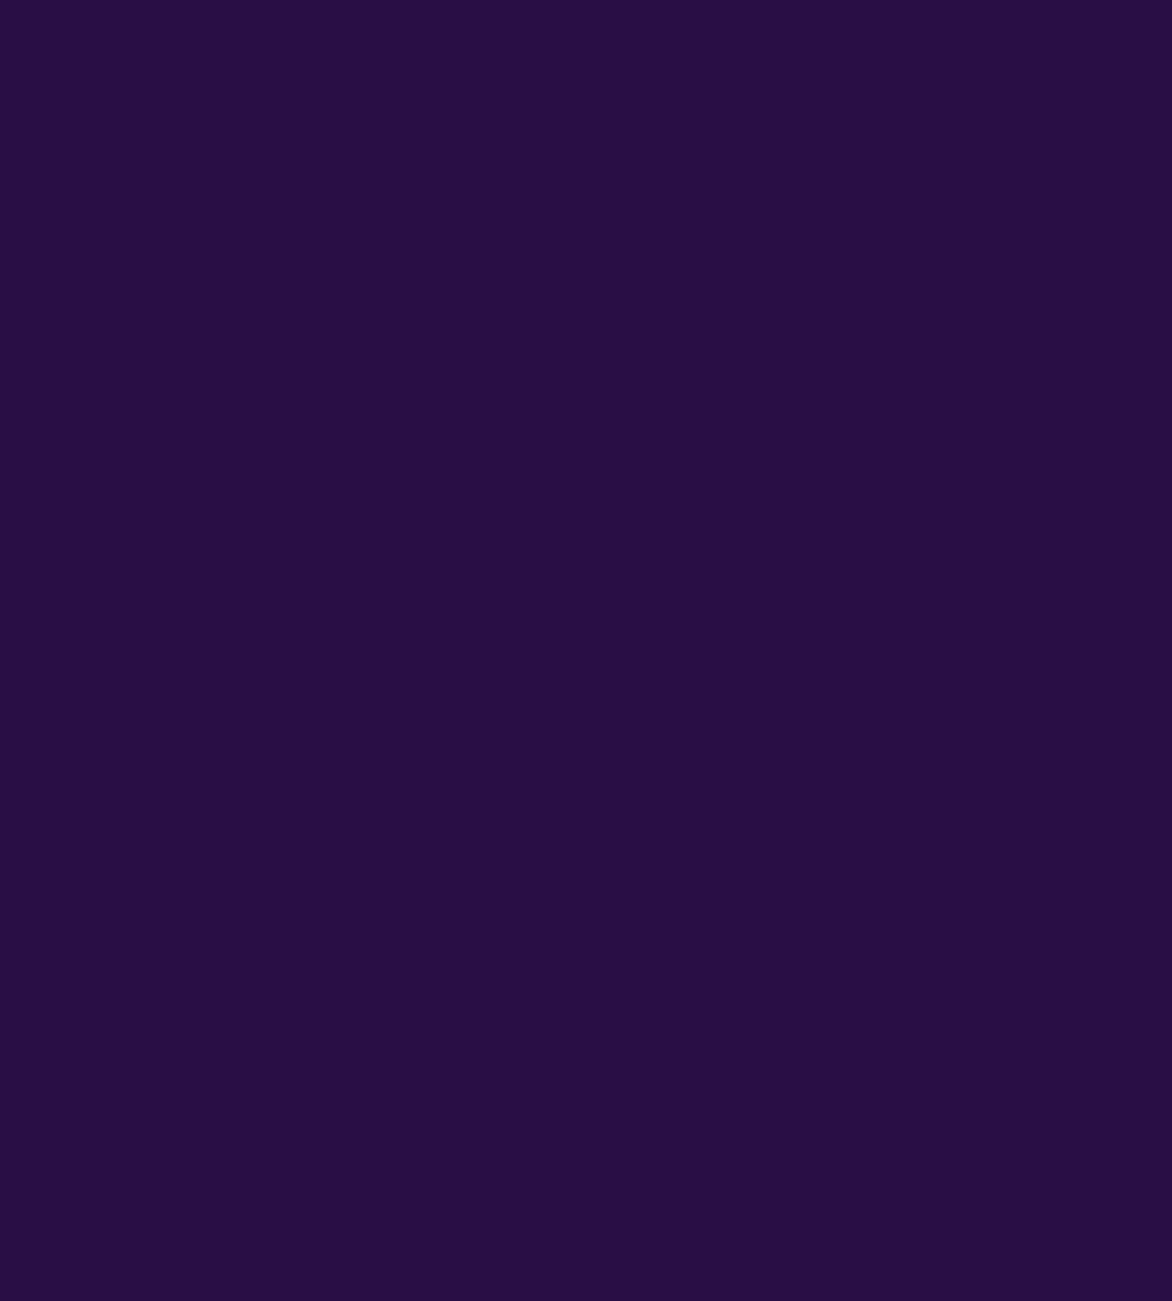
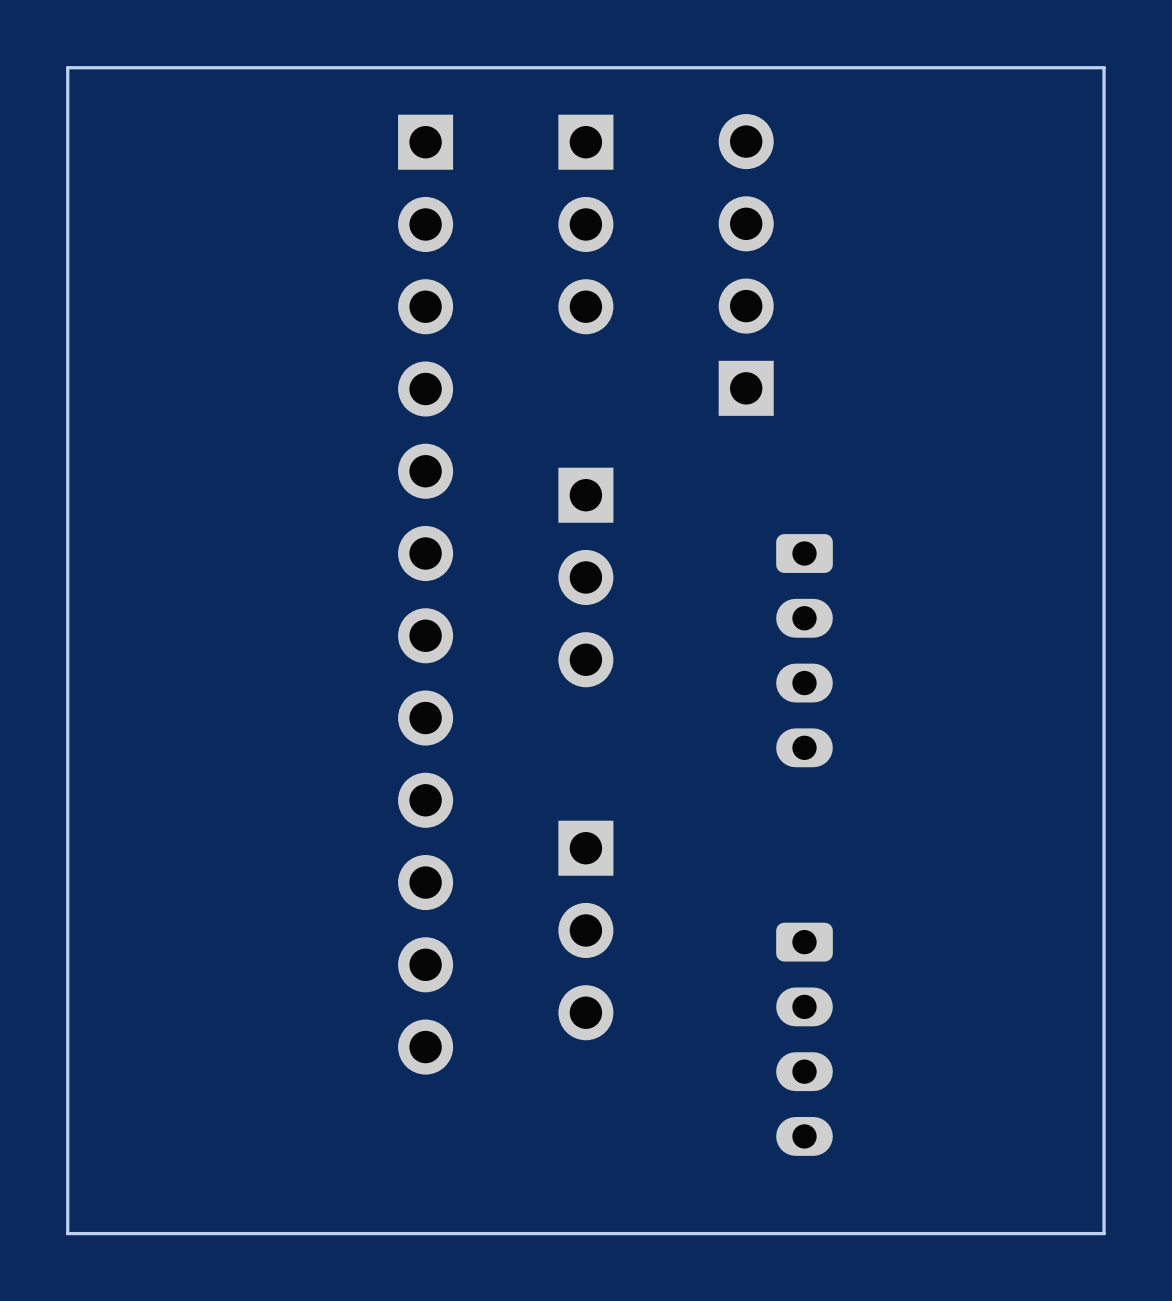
board edge: none -> (1104, 67) (1104, 1233) (67, 1233) (67, 67) (1104, 67)
part: none -> (585, 224)
part: none -> (746, 264)
part: none -> (585, 577)
part: none -> (425, 594)
part: none -> (804, 650)
part: none -> (585, 930)
part: none -> (804, 1039)

